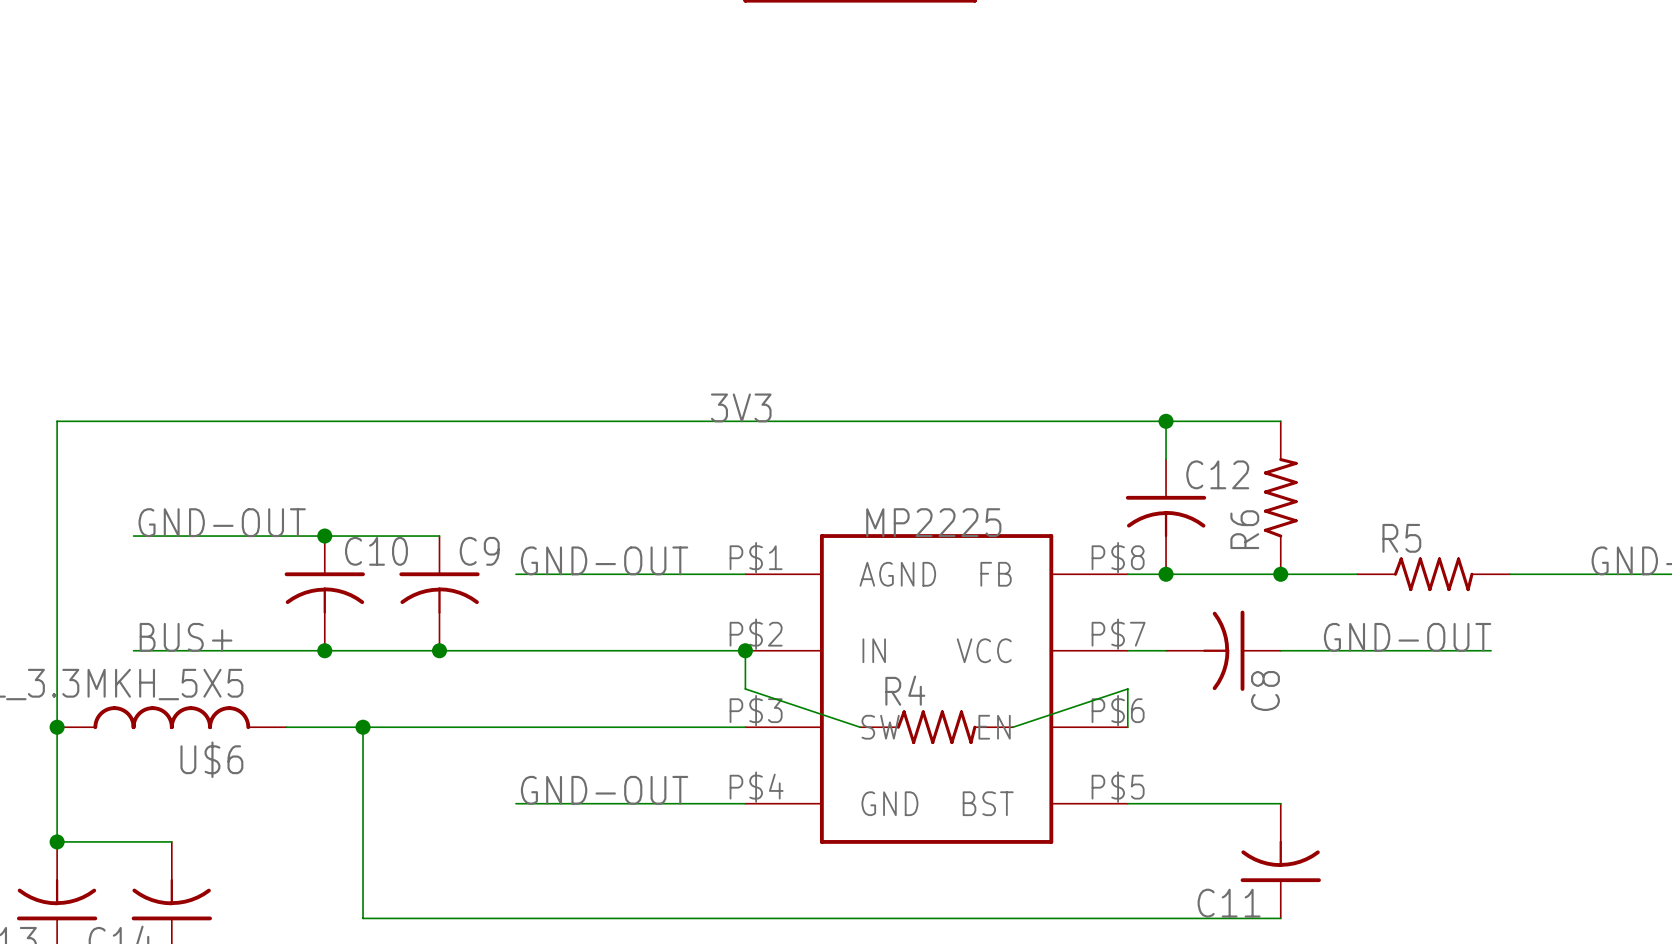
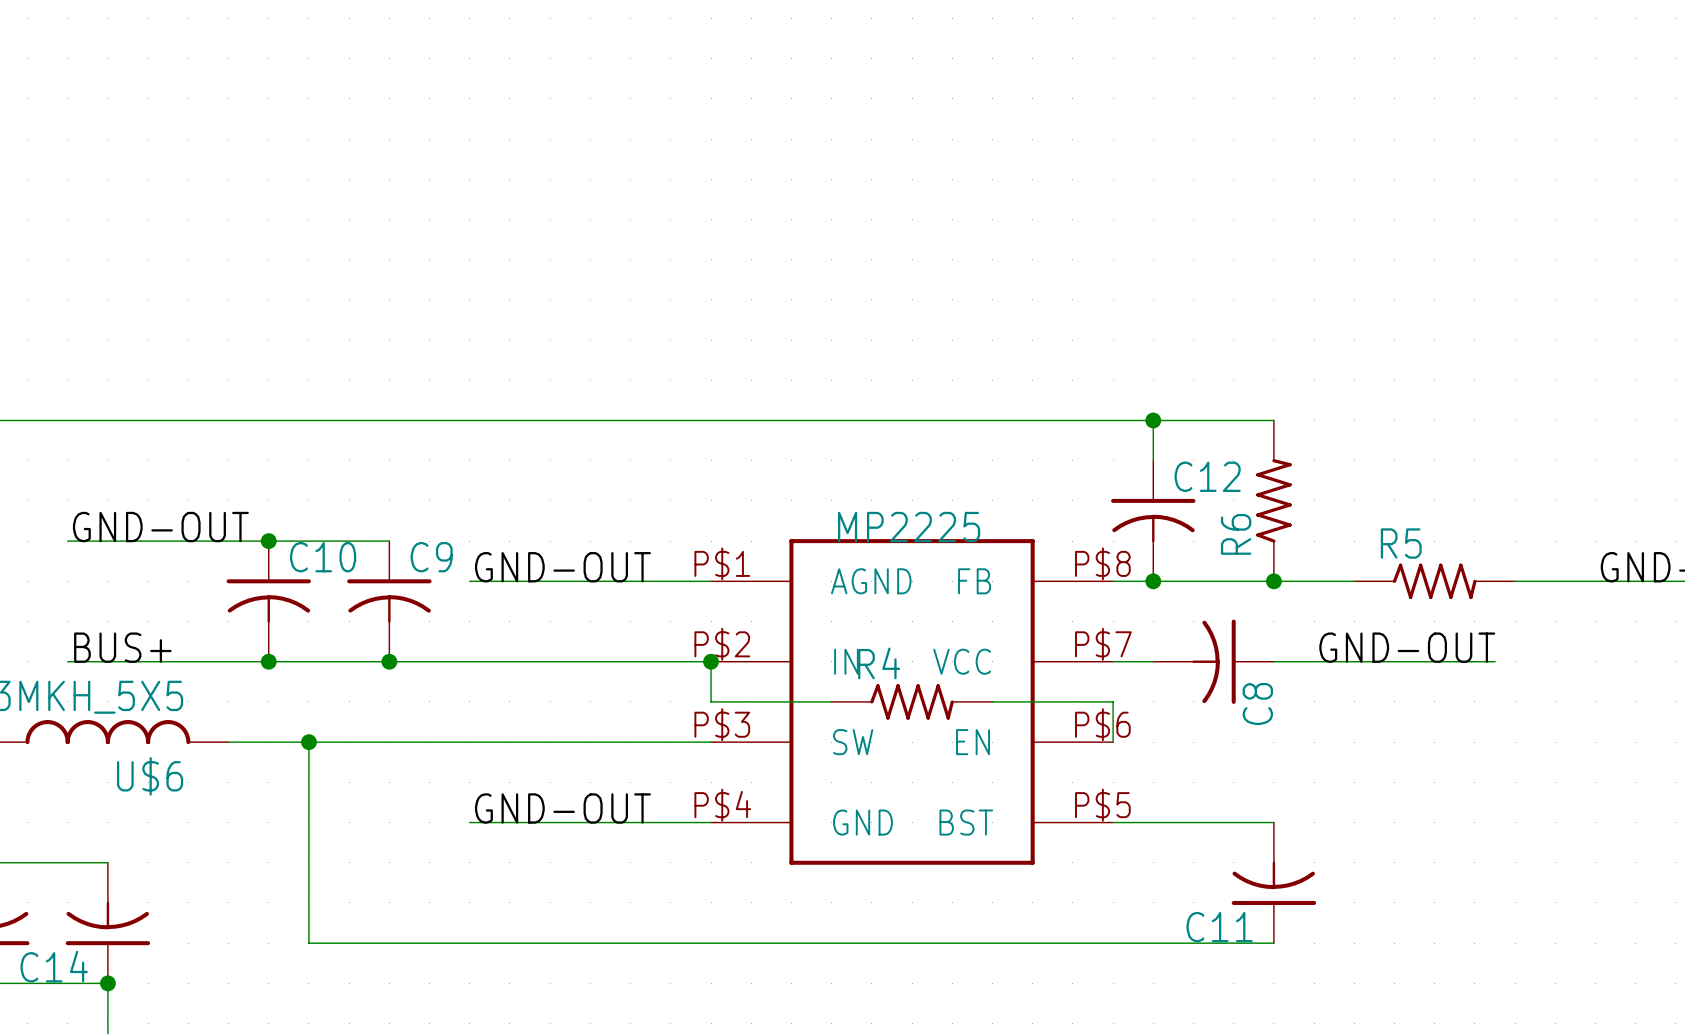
label: 3V3 (741, 407) -> none
wire: (745, 688) (860, 727) -> (711, 701) (831, 701)
wire: (1127, 688) (1013, 727) -> (1113, 701) (992, 701)
R4 position: (936, 727) -> (912, 701)

